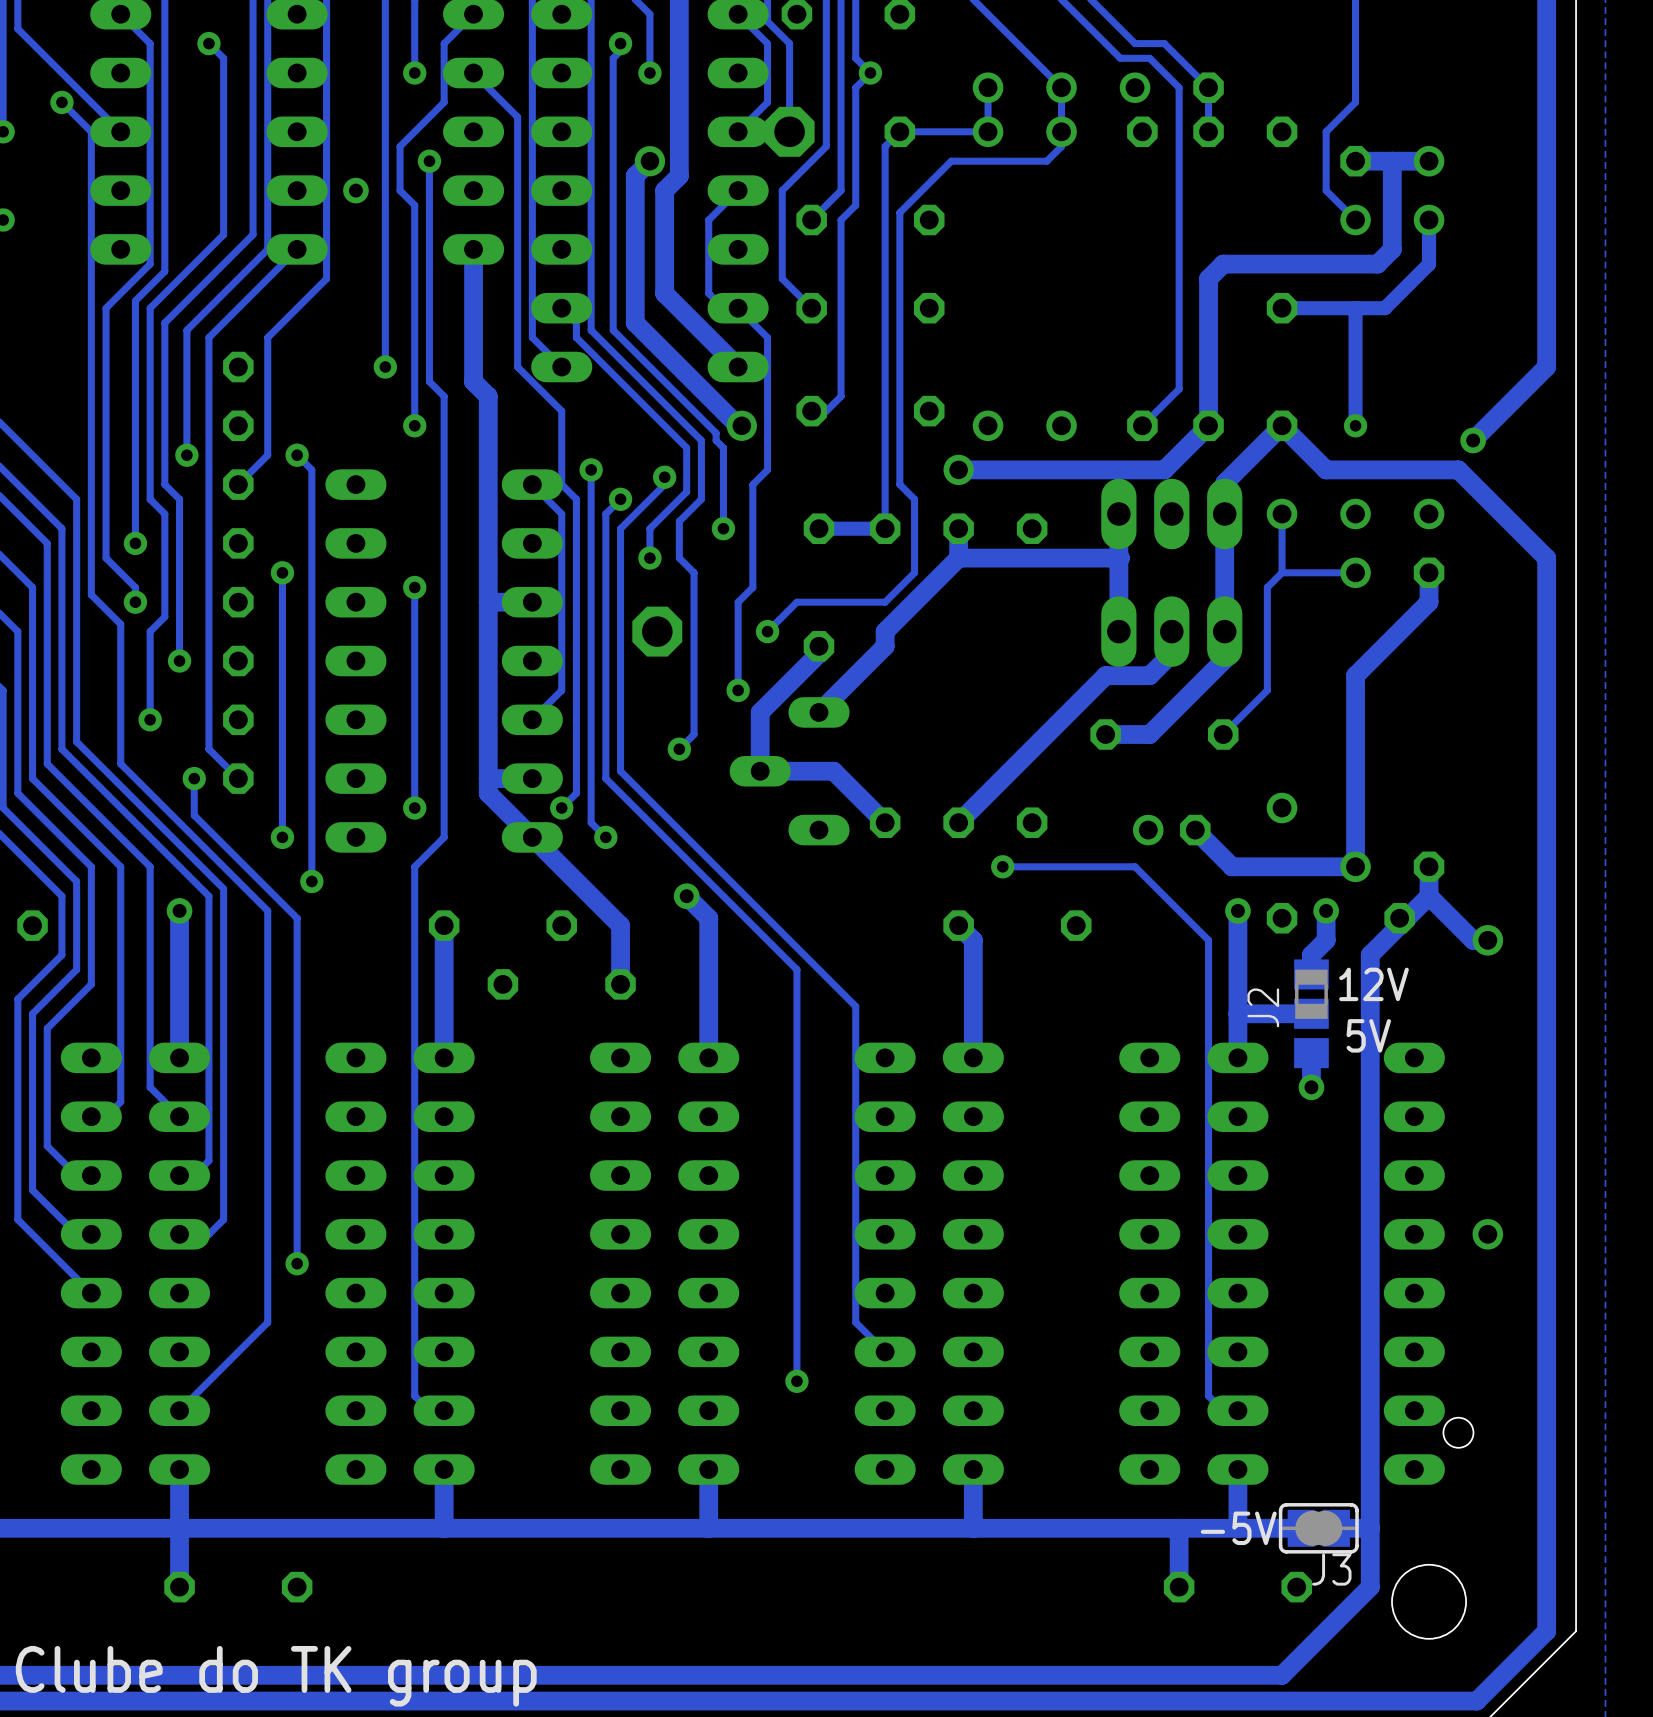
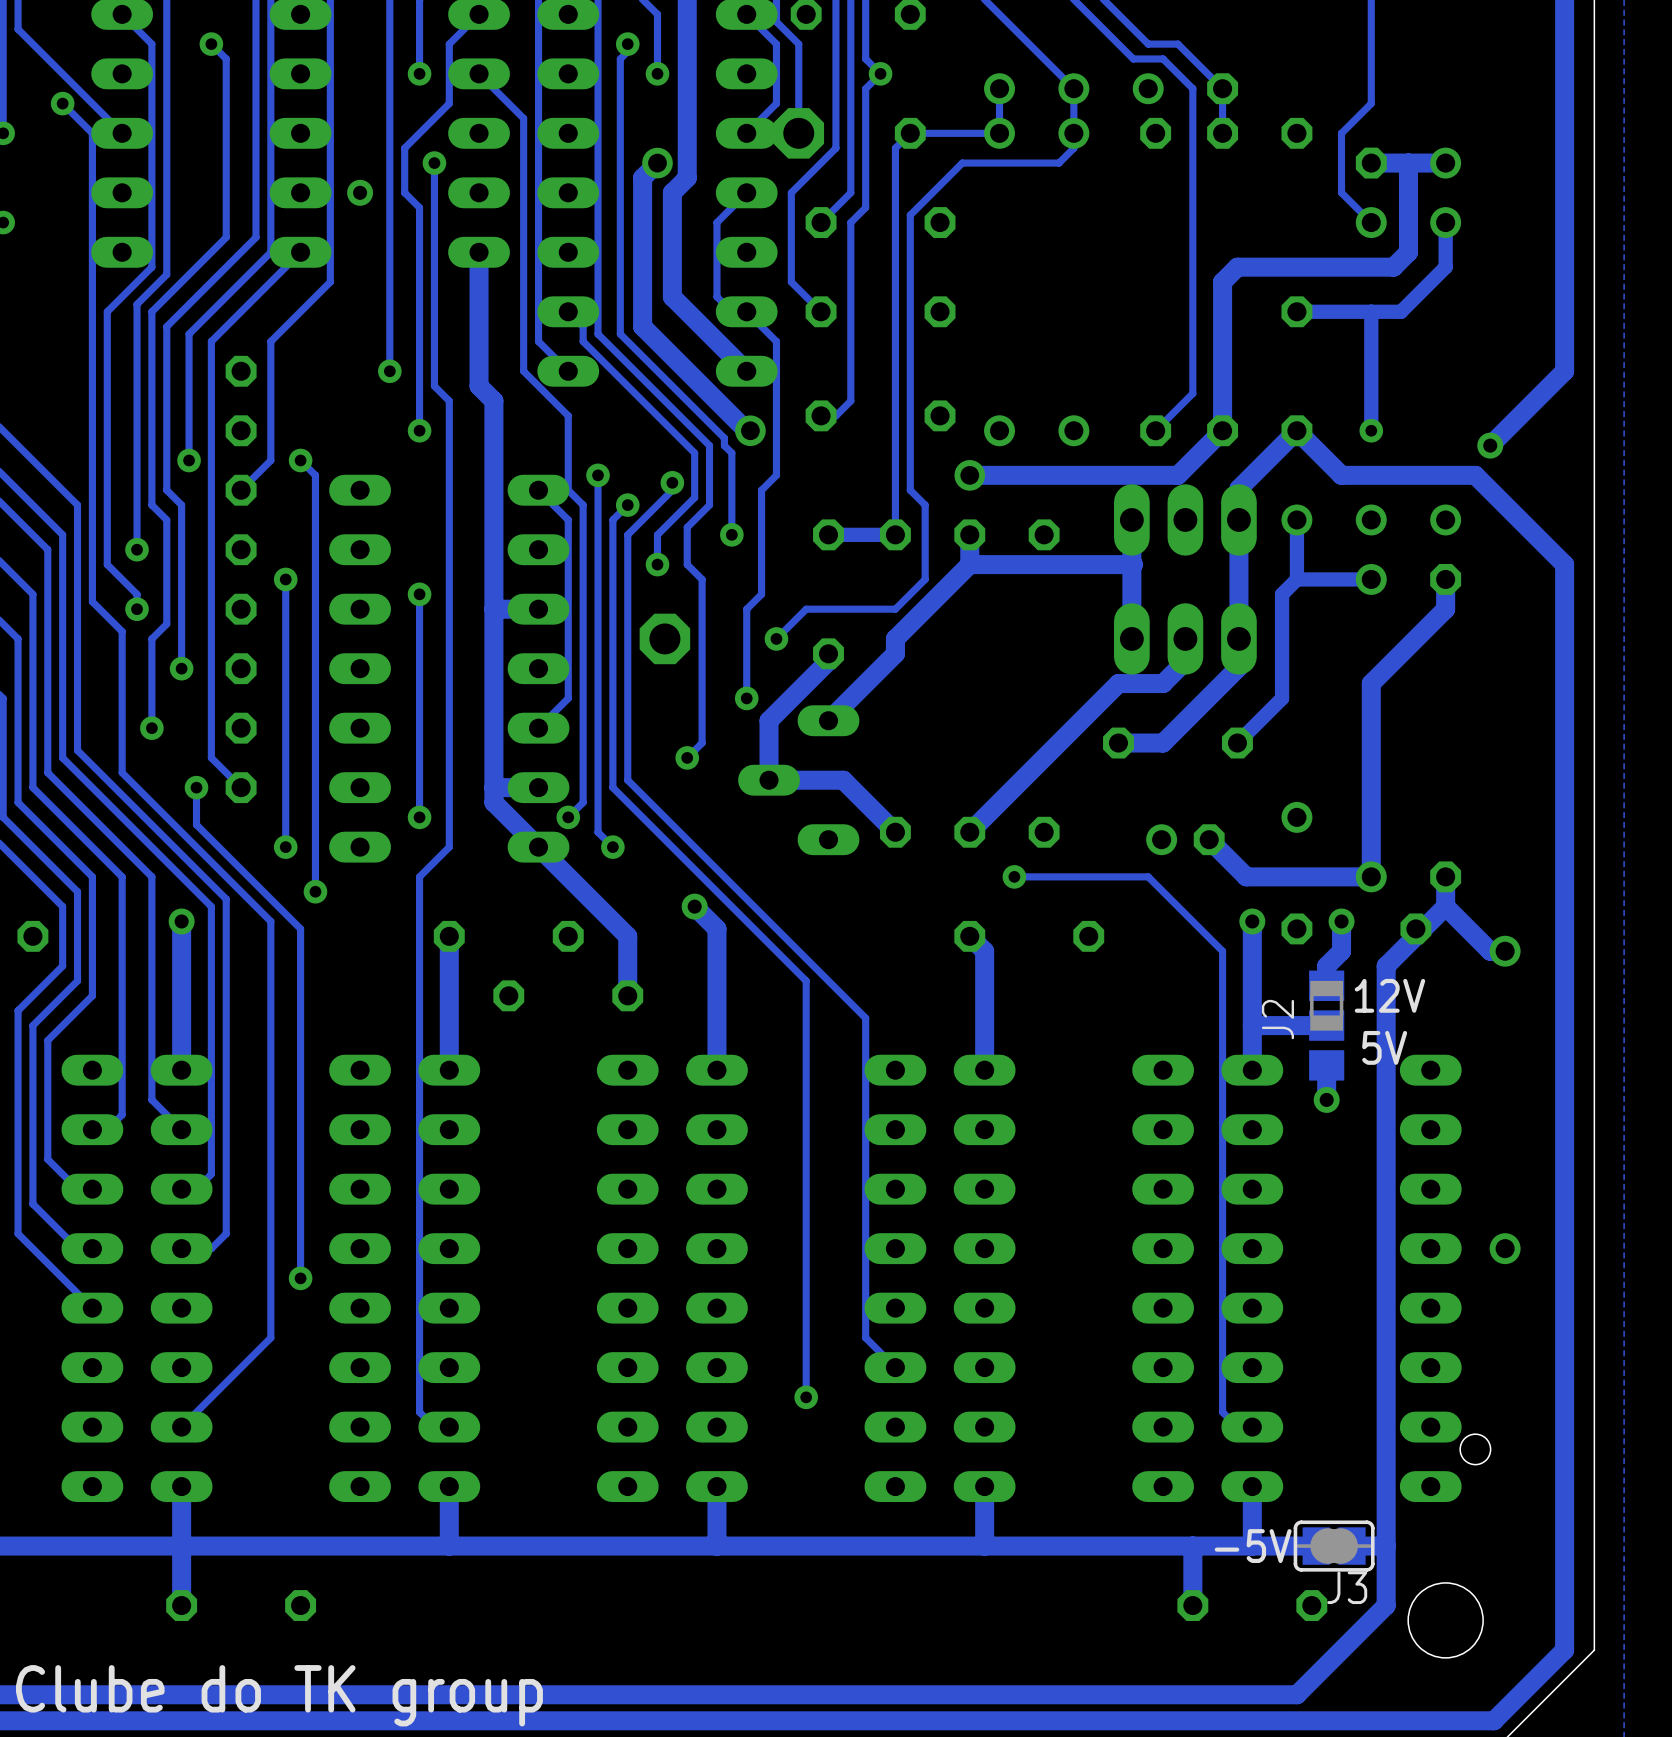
track width: thin (1282, 514) (1282, 572) -> thick (1296, 519) (1296, 579)
track width: thin (1282, 572) (1267, 587) (1267, 690) (1223, 734) -> thick (1296, 579) (1282, 594) (1282, 698) (1237, 743)
track width: thin (1355, 572) (1282, 572) -> thick (1371, 579) (1296, 579)

